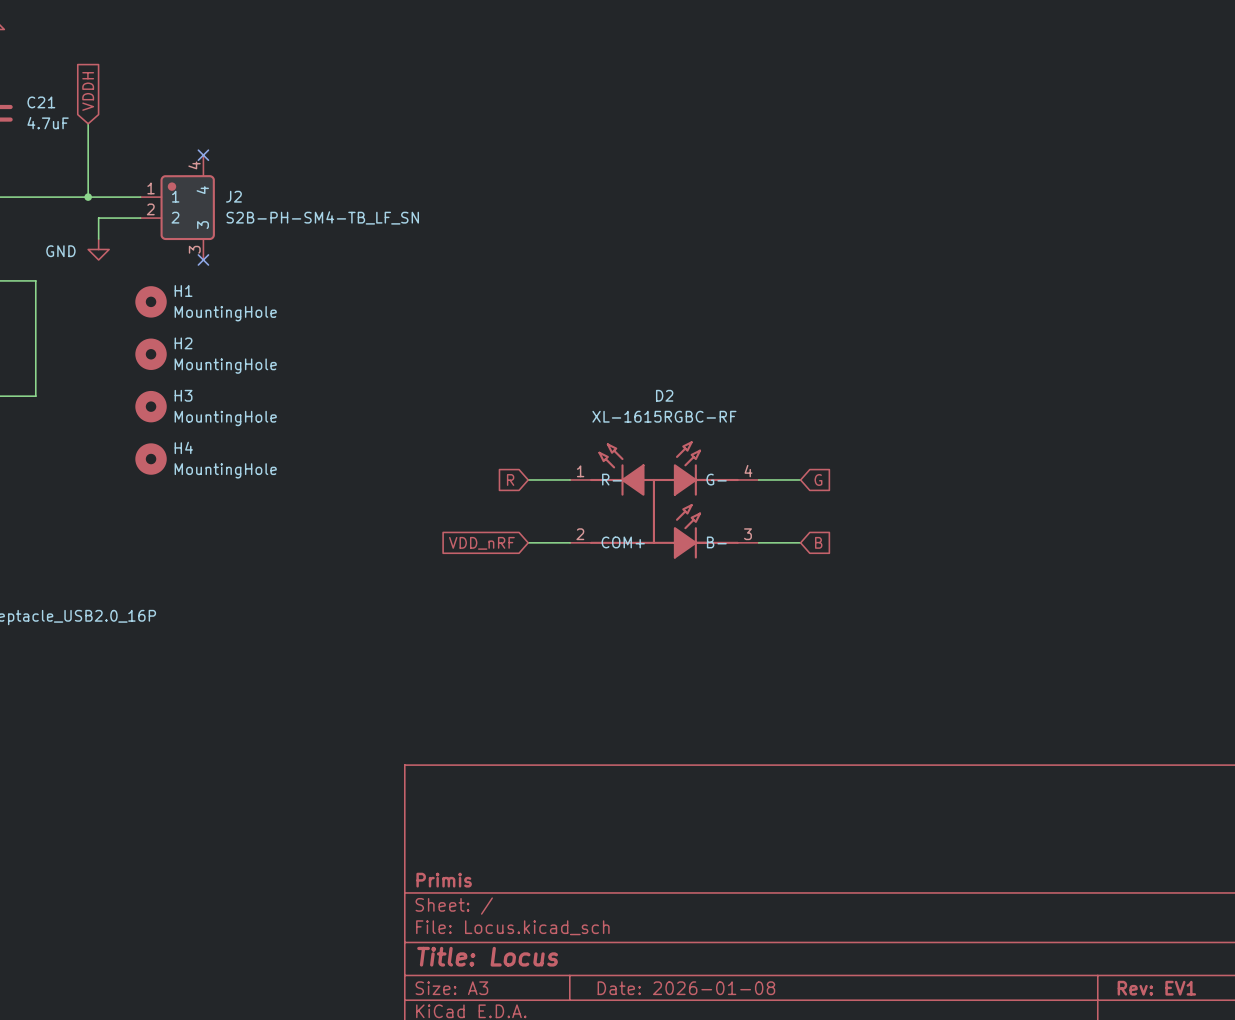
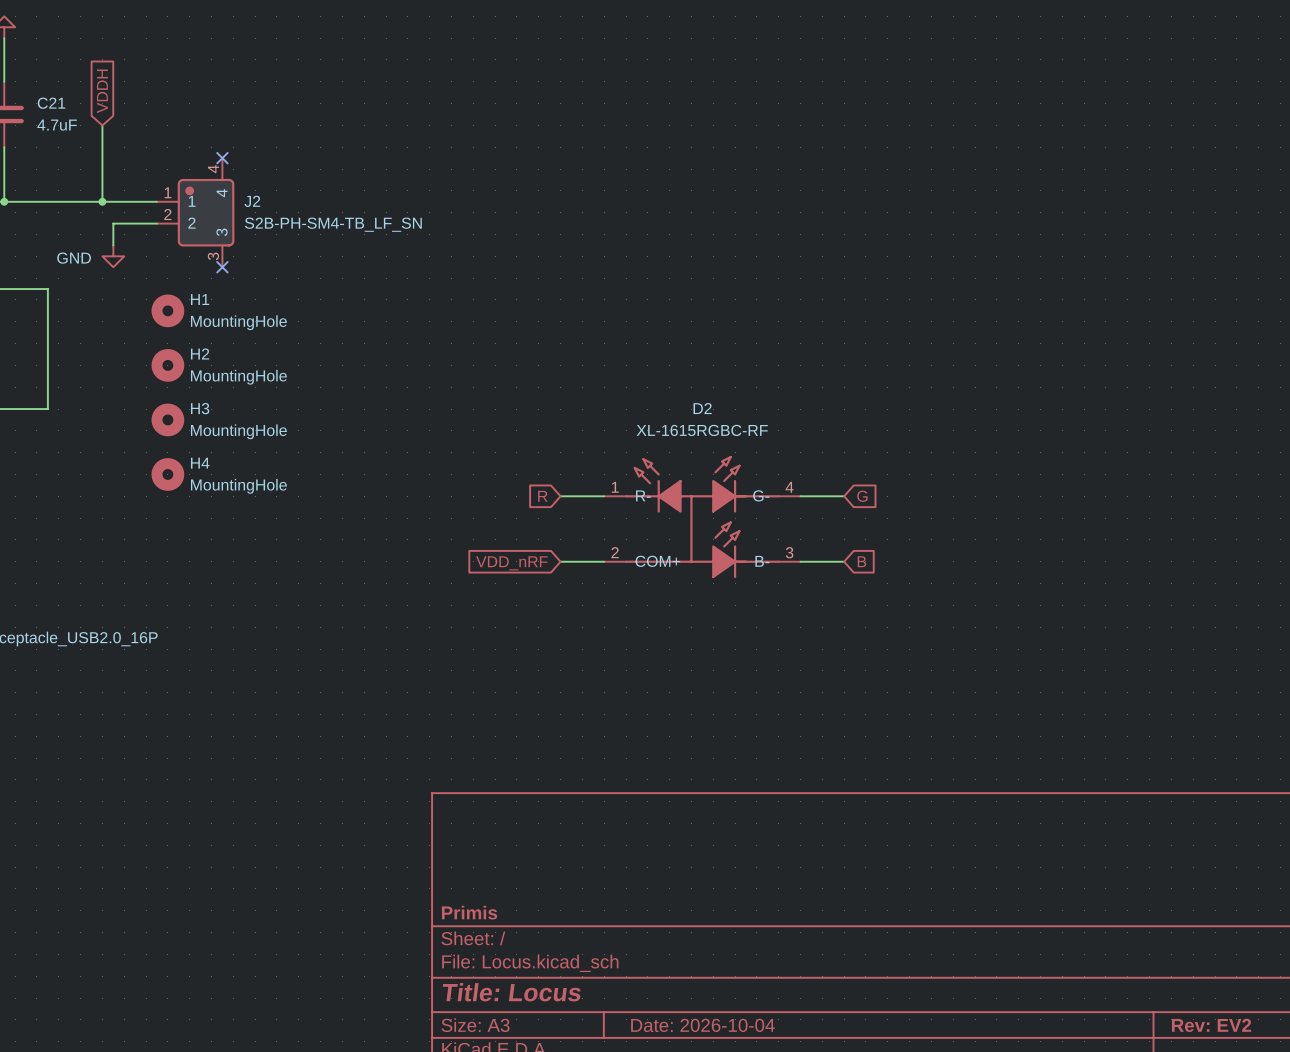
title block: Date: 2026-01-08 (686, 988) -> Date: 2026-10-04 (702, 1025)
title block: Rev: EV1 (1156, 988) -> Rev: EV2 (1211, 1025)

